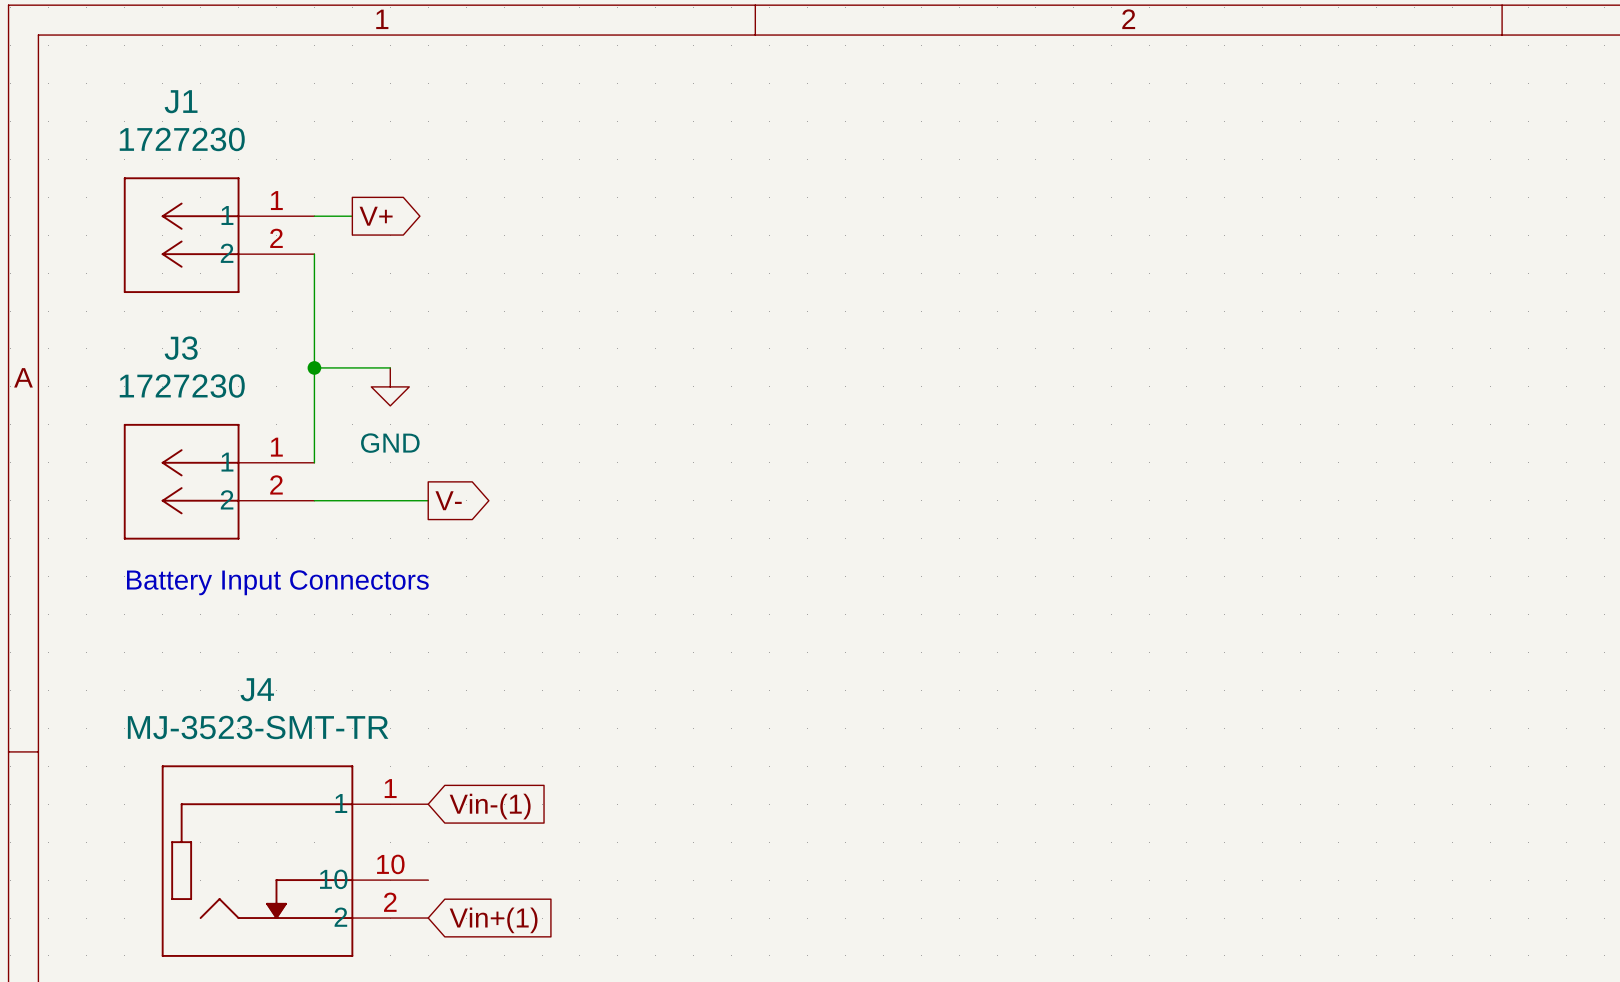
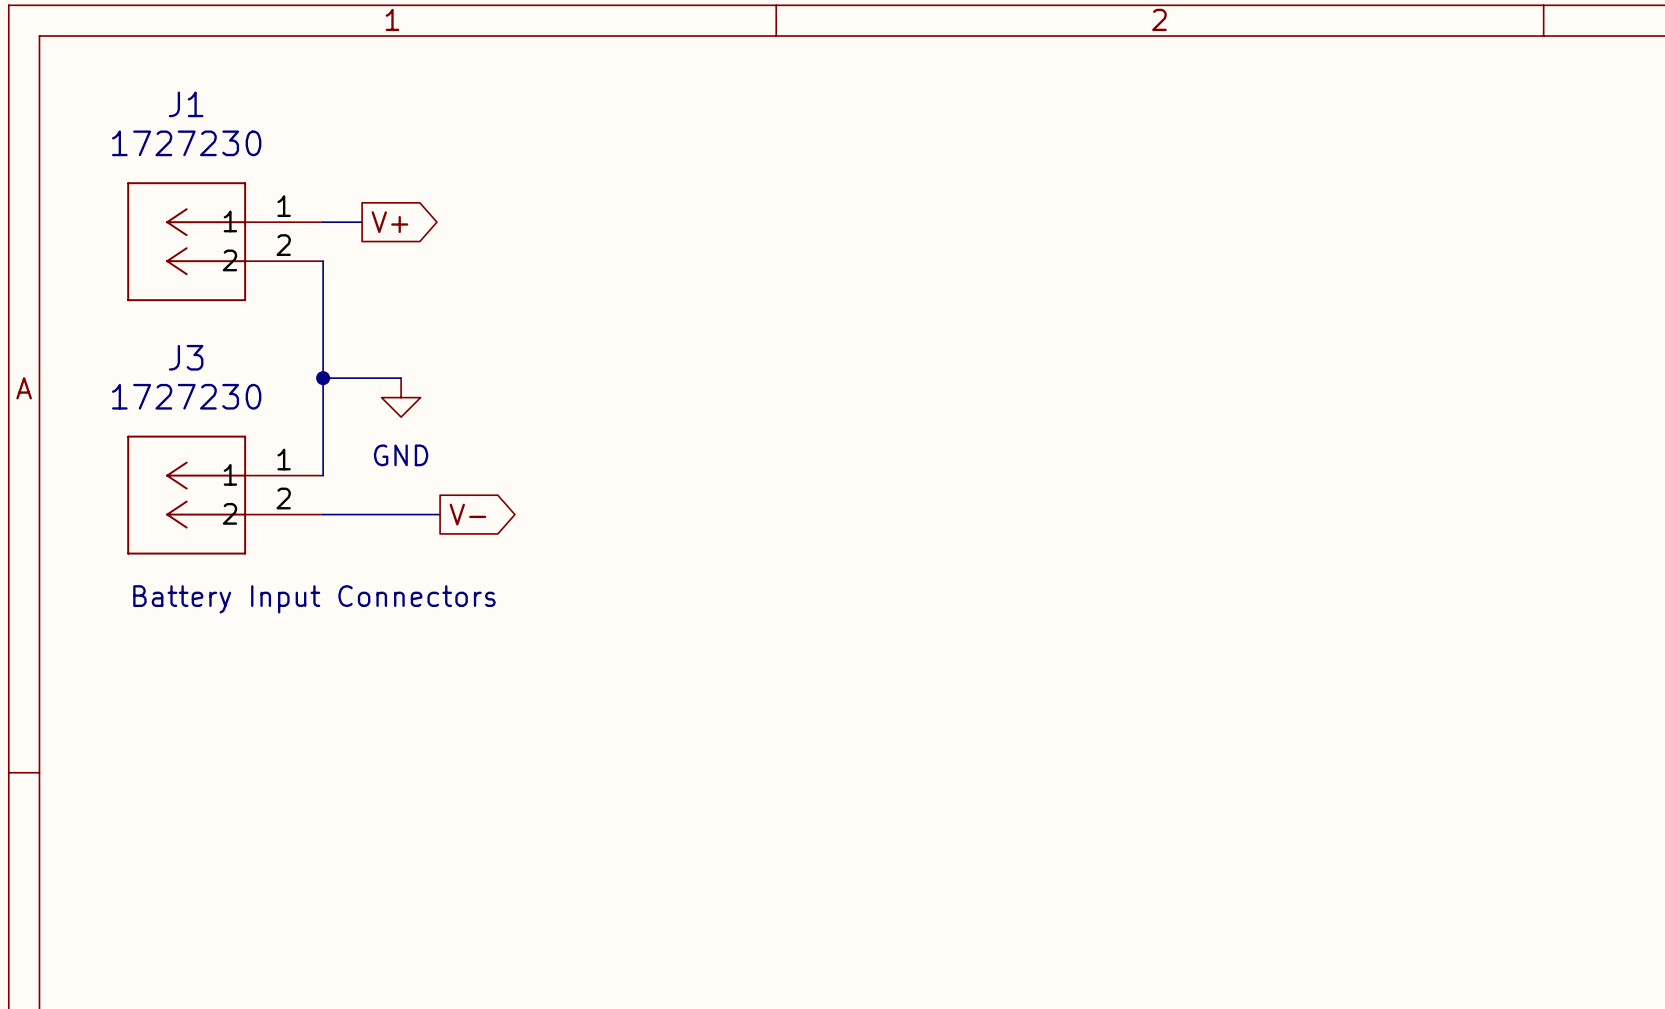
global label: Vin-(1) (490, 806) -> none
J4: MJ-3523-SMT-TR (294, 861) -> none
global label: Vin+(1) (493, 920) -> none

